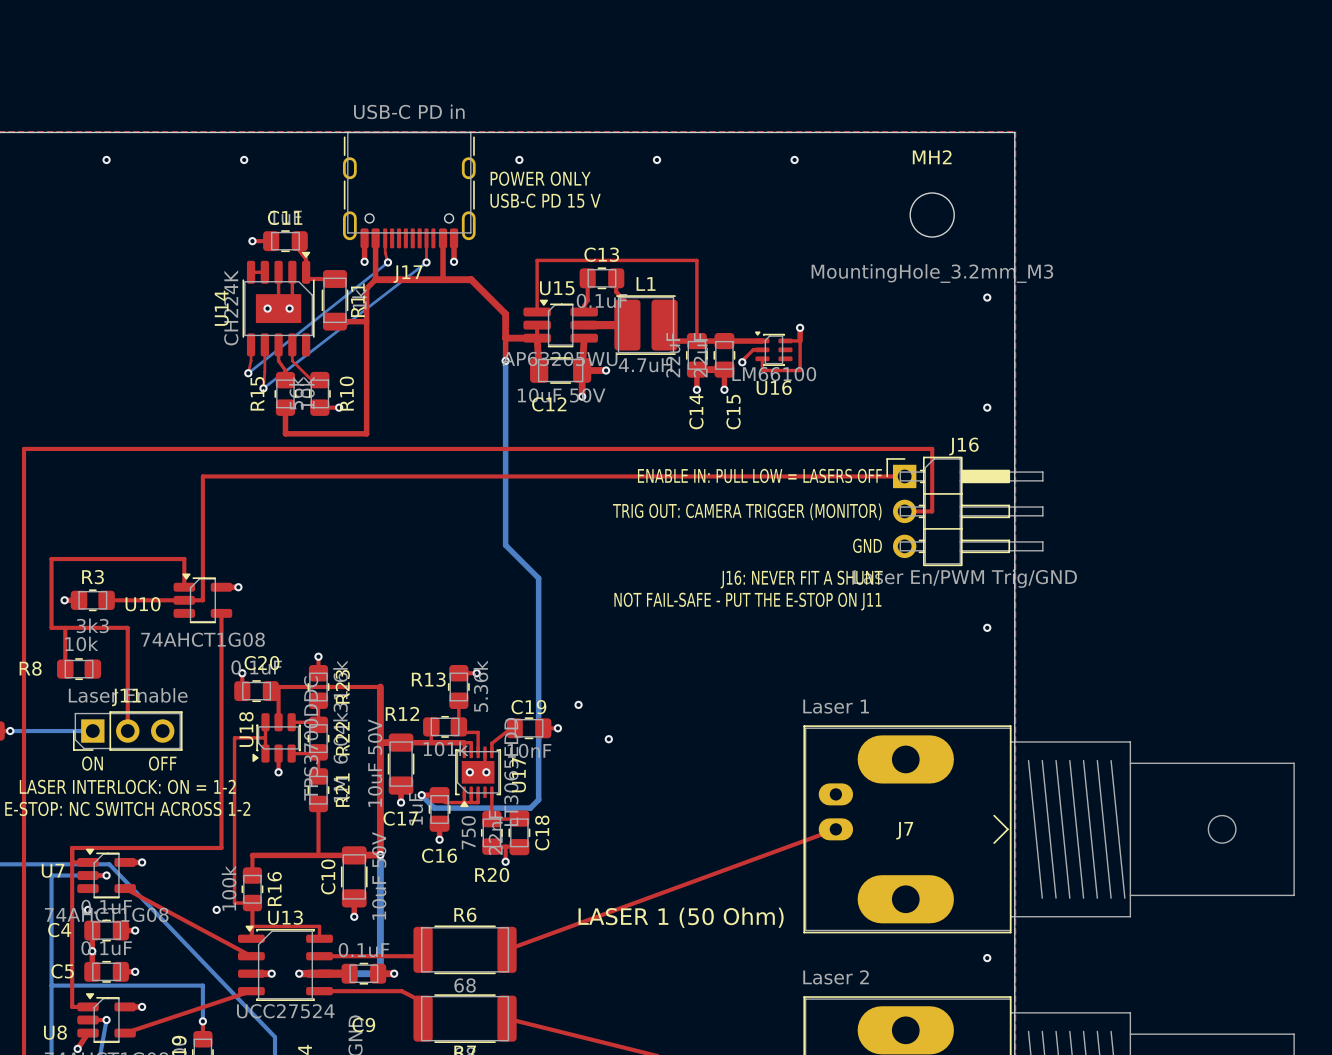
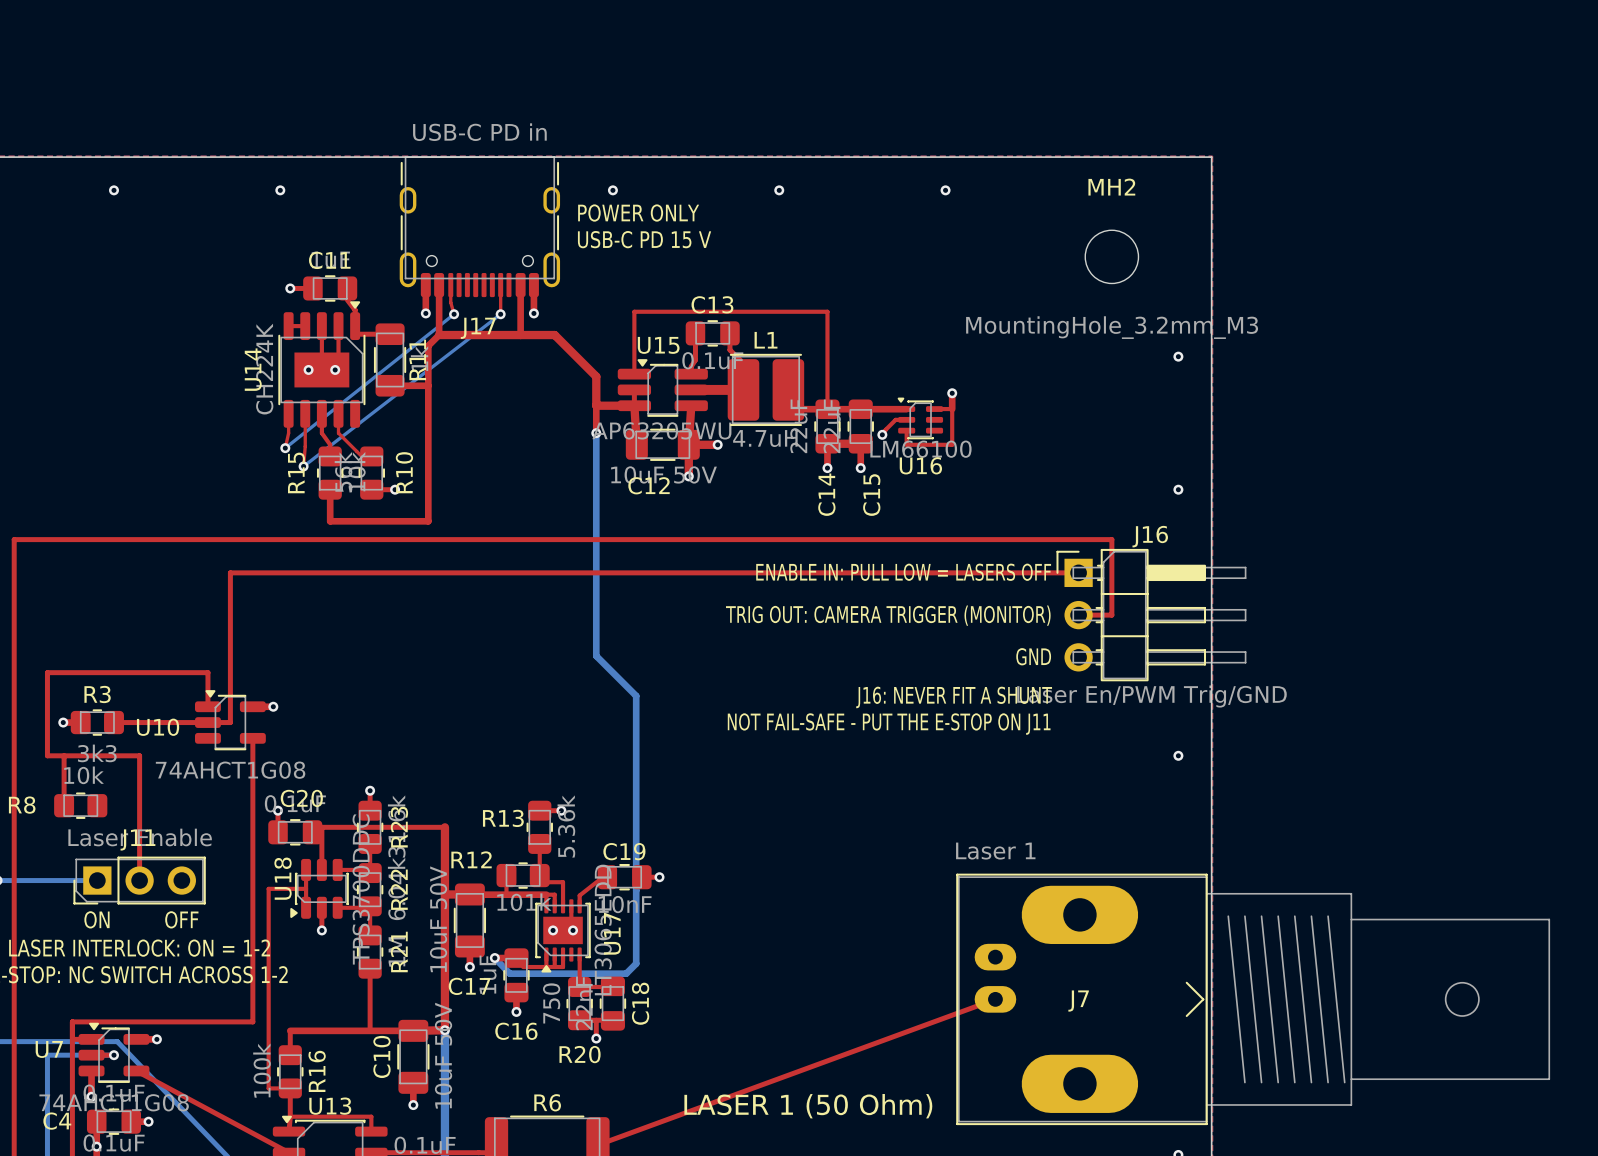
via: (578, 704) -> none
via: (608, 739) -> none
top track: none -> (91, 1070) (91, 1096)
via: (216, 909) -> none

